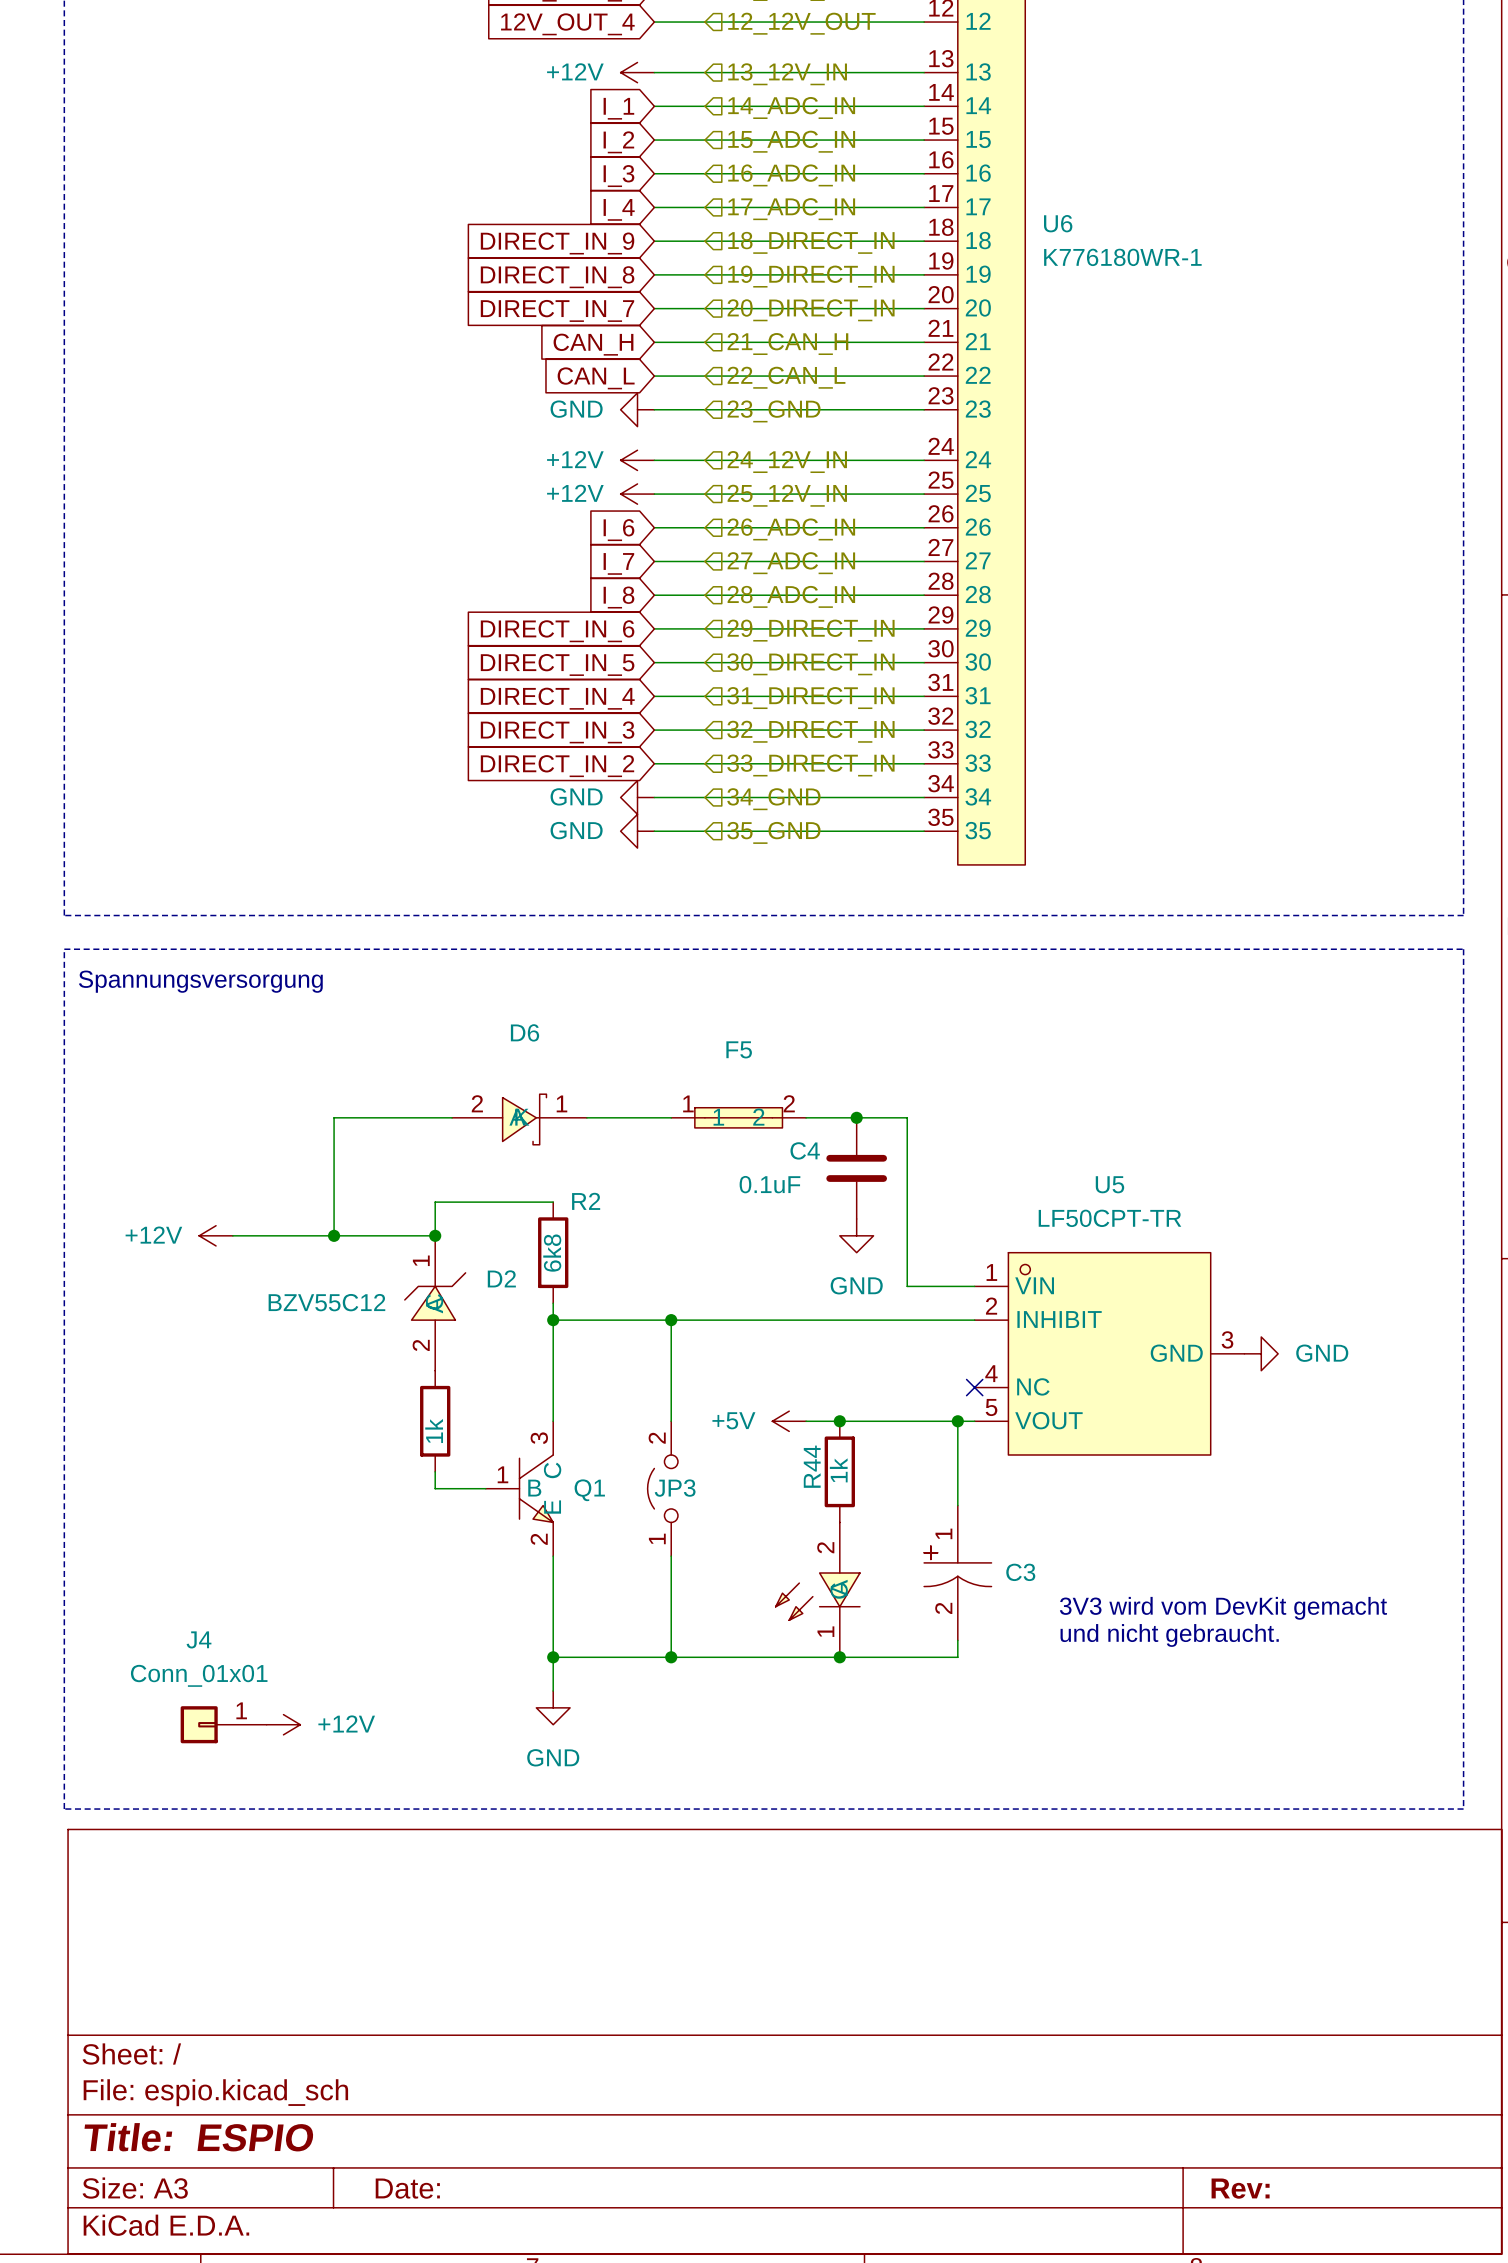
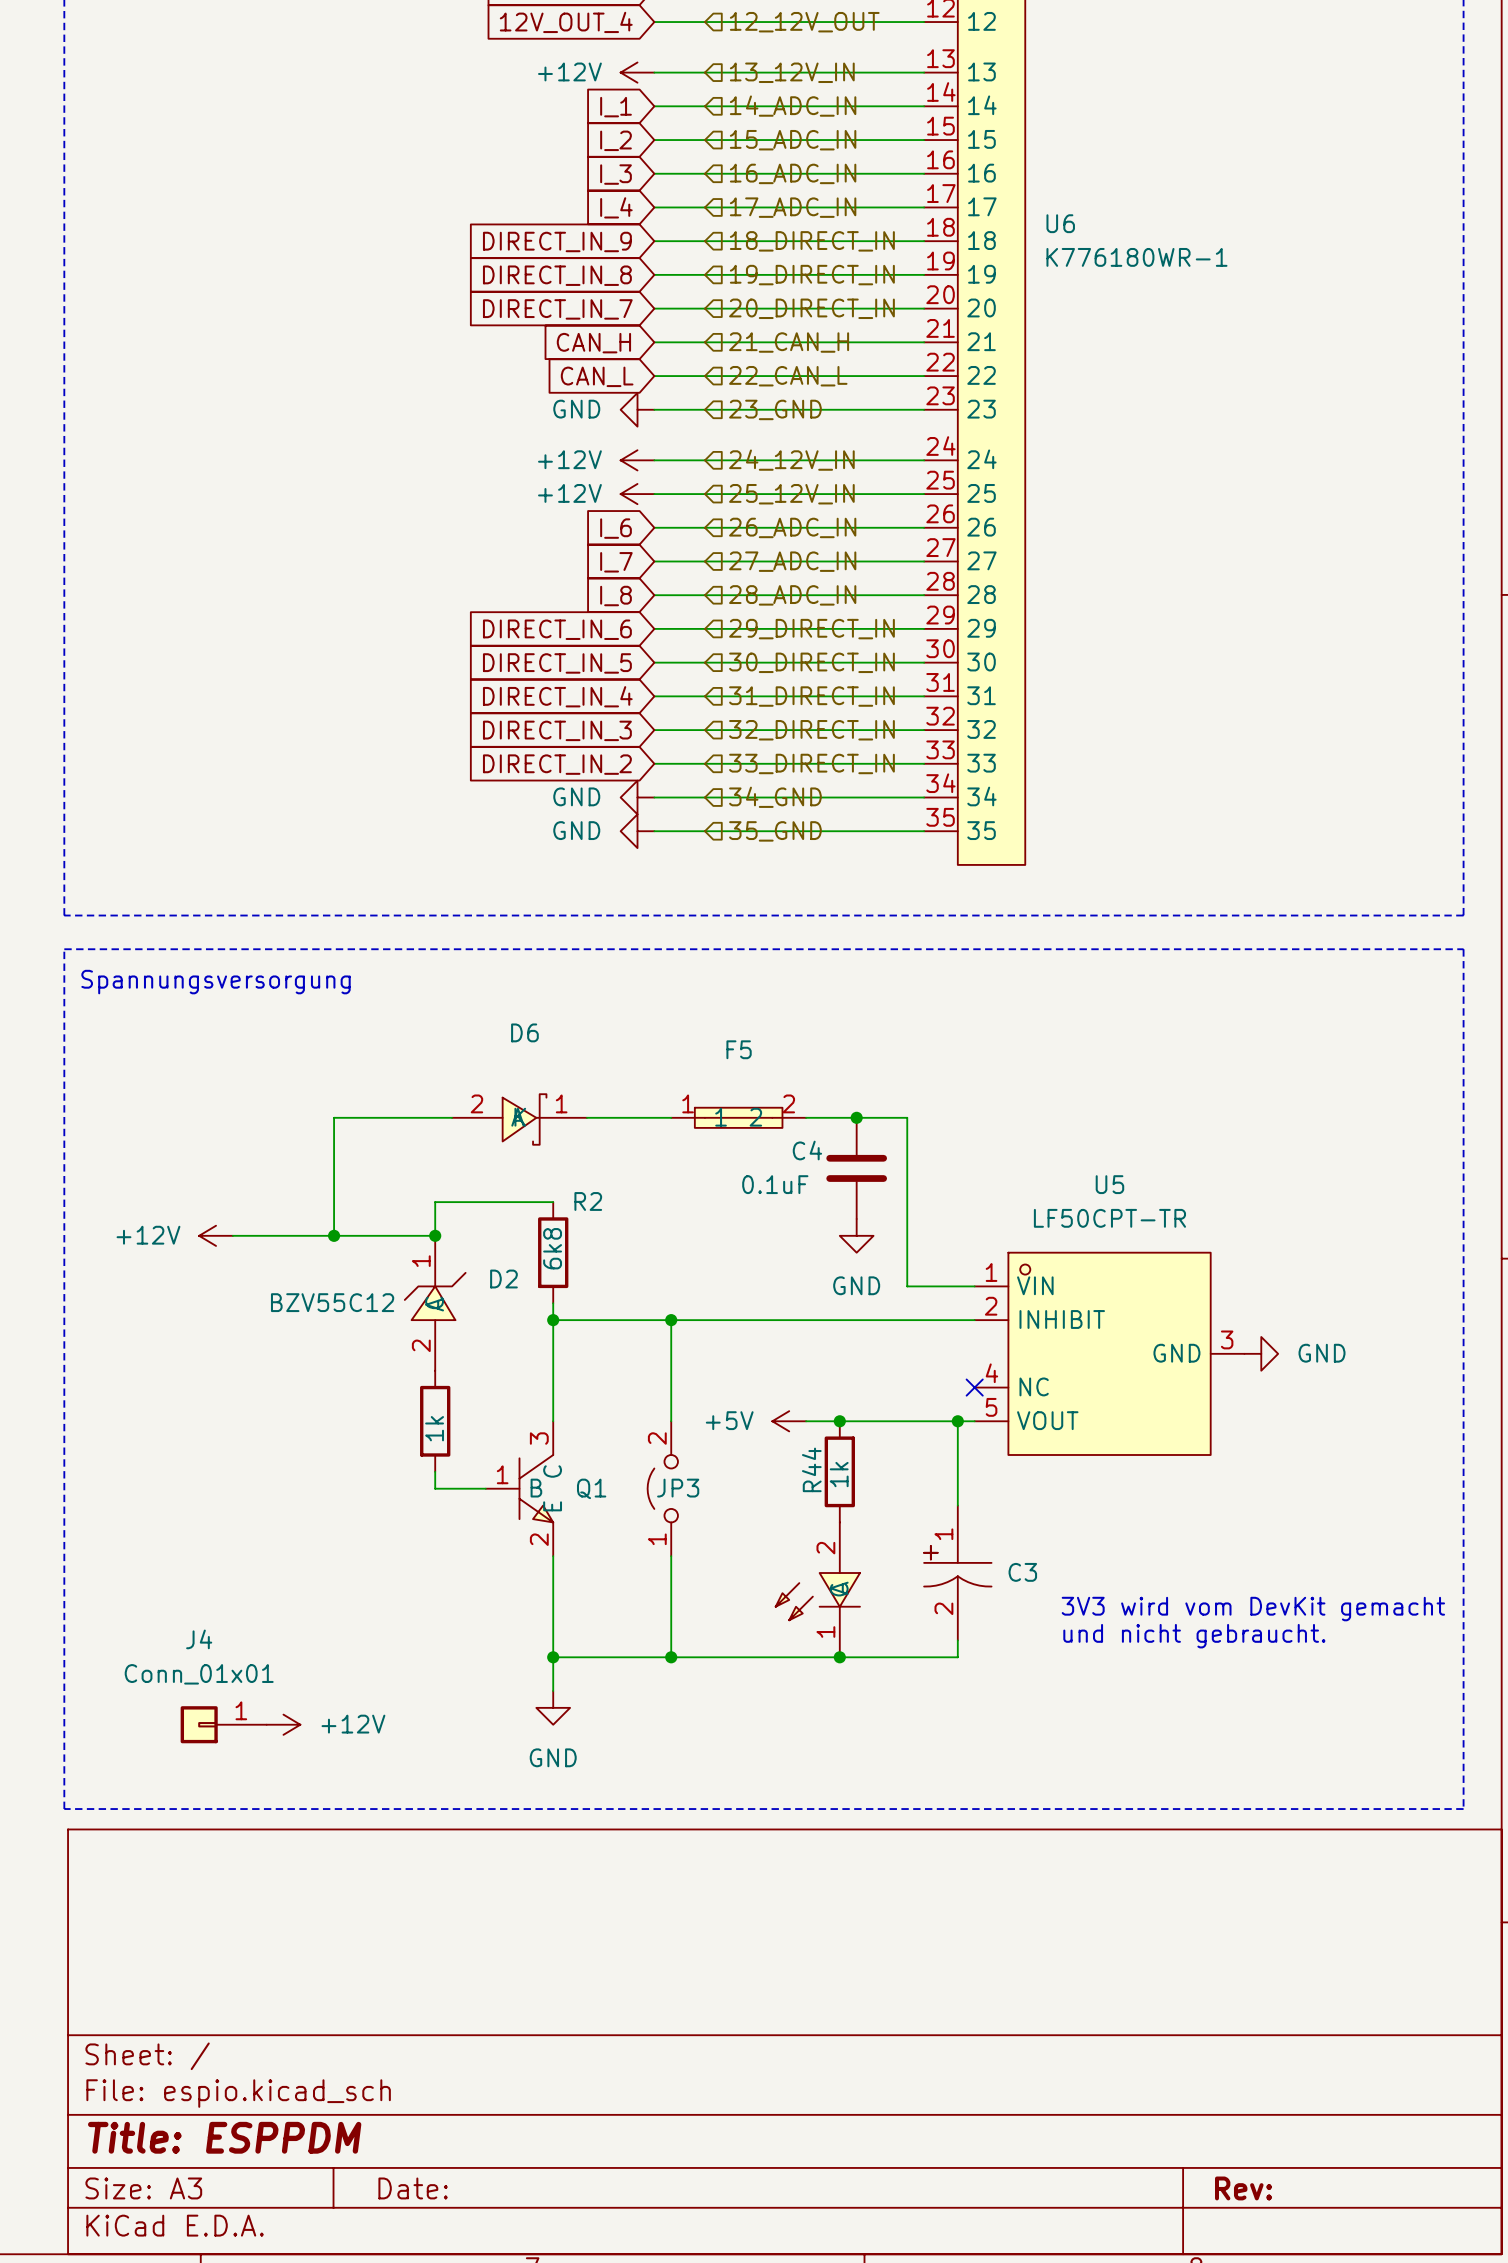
title block: Title: ESPIO (199, 2137) -> Title: ESPPDM (224, 2137)

